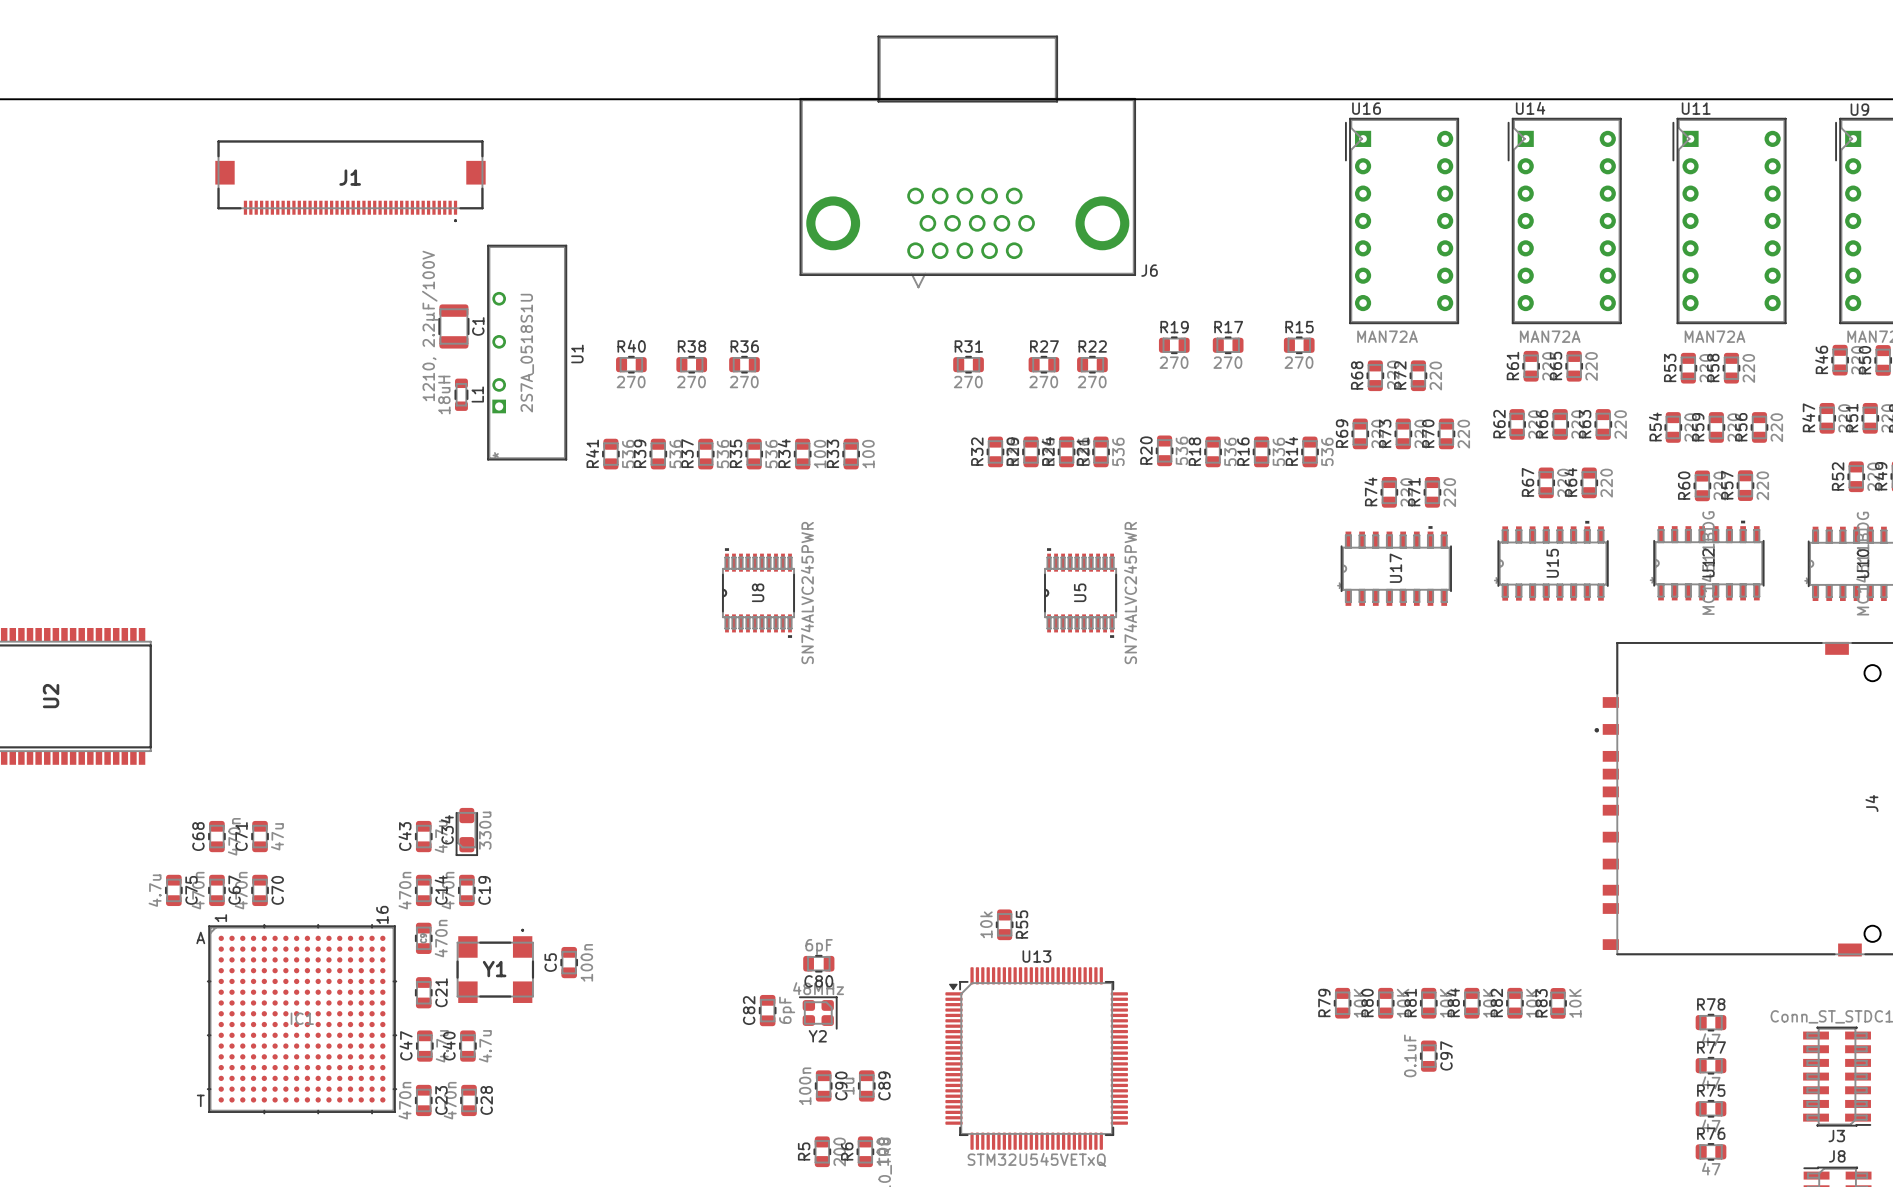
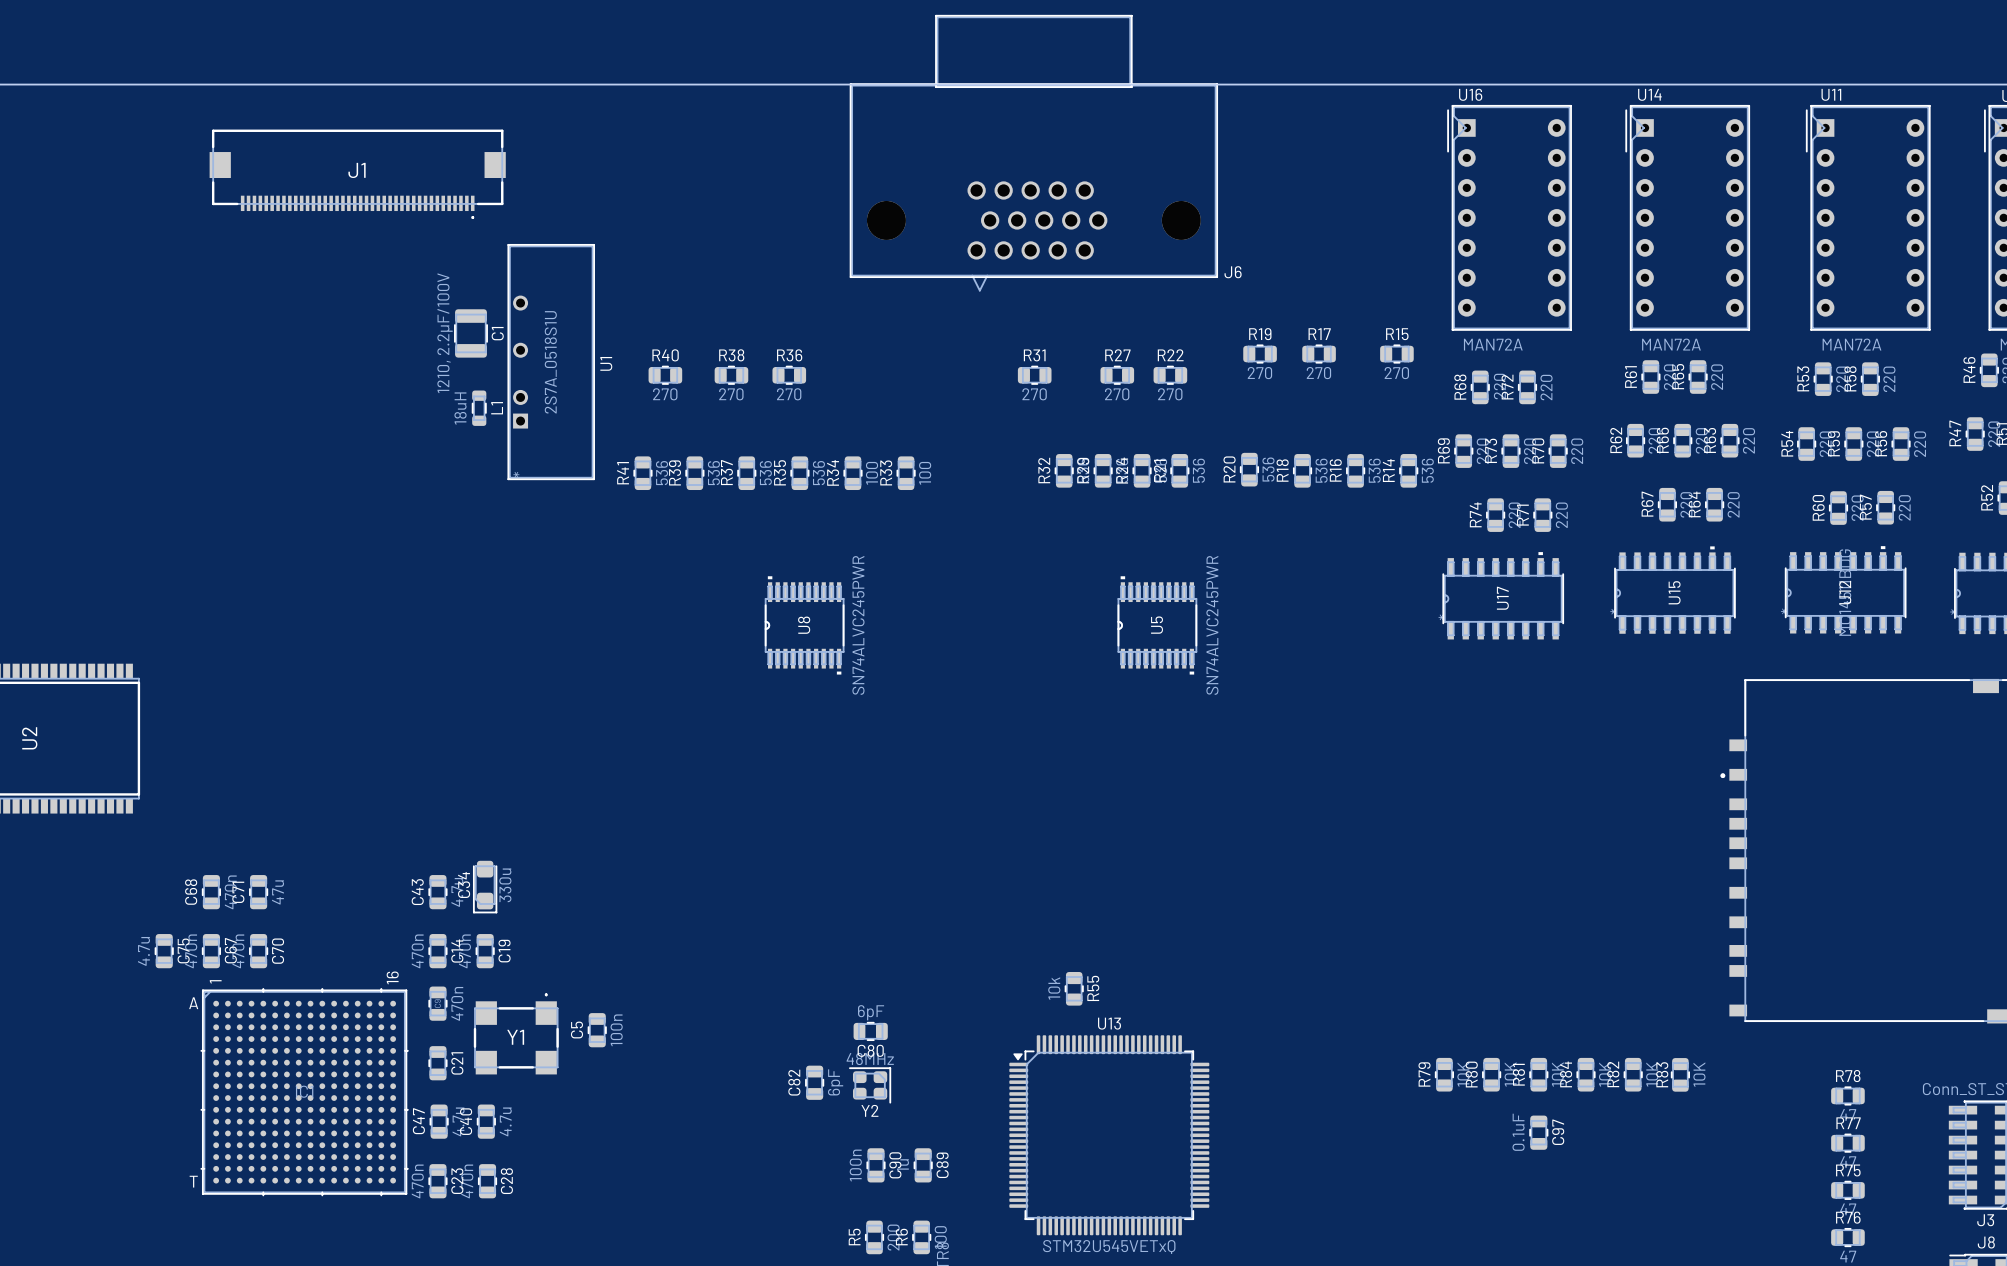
J6 footprint: [799, 35, 1136, 288] -> [849, 14, 1219, 291]

